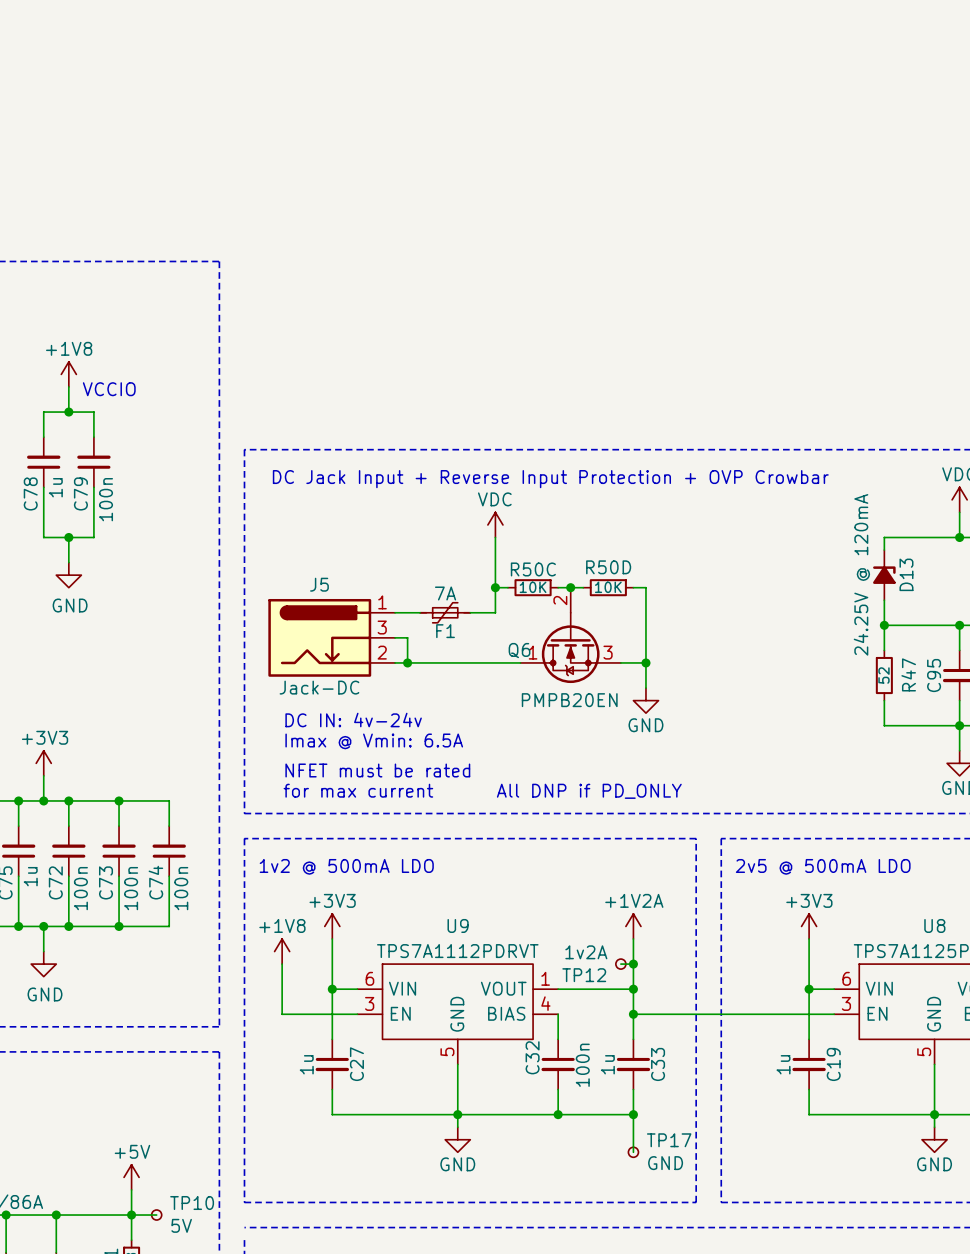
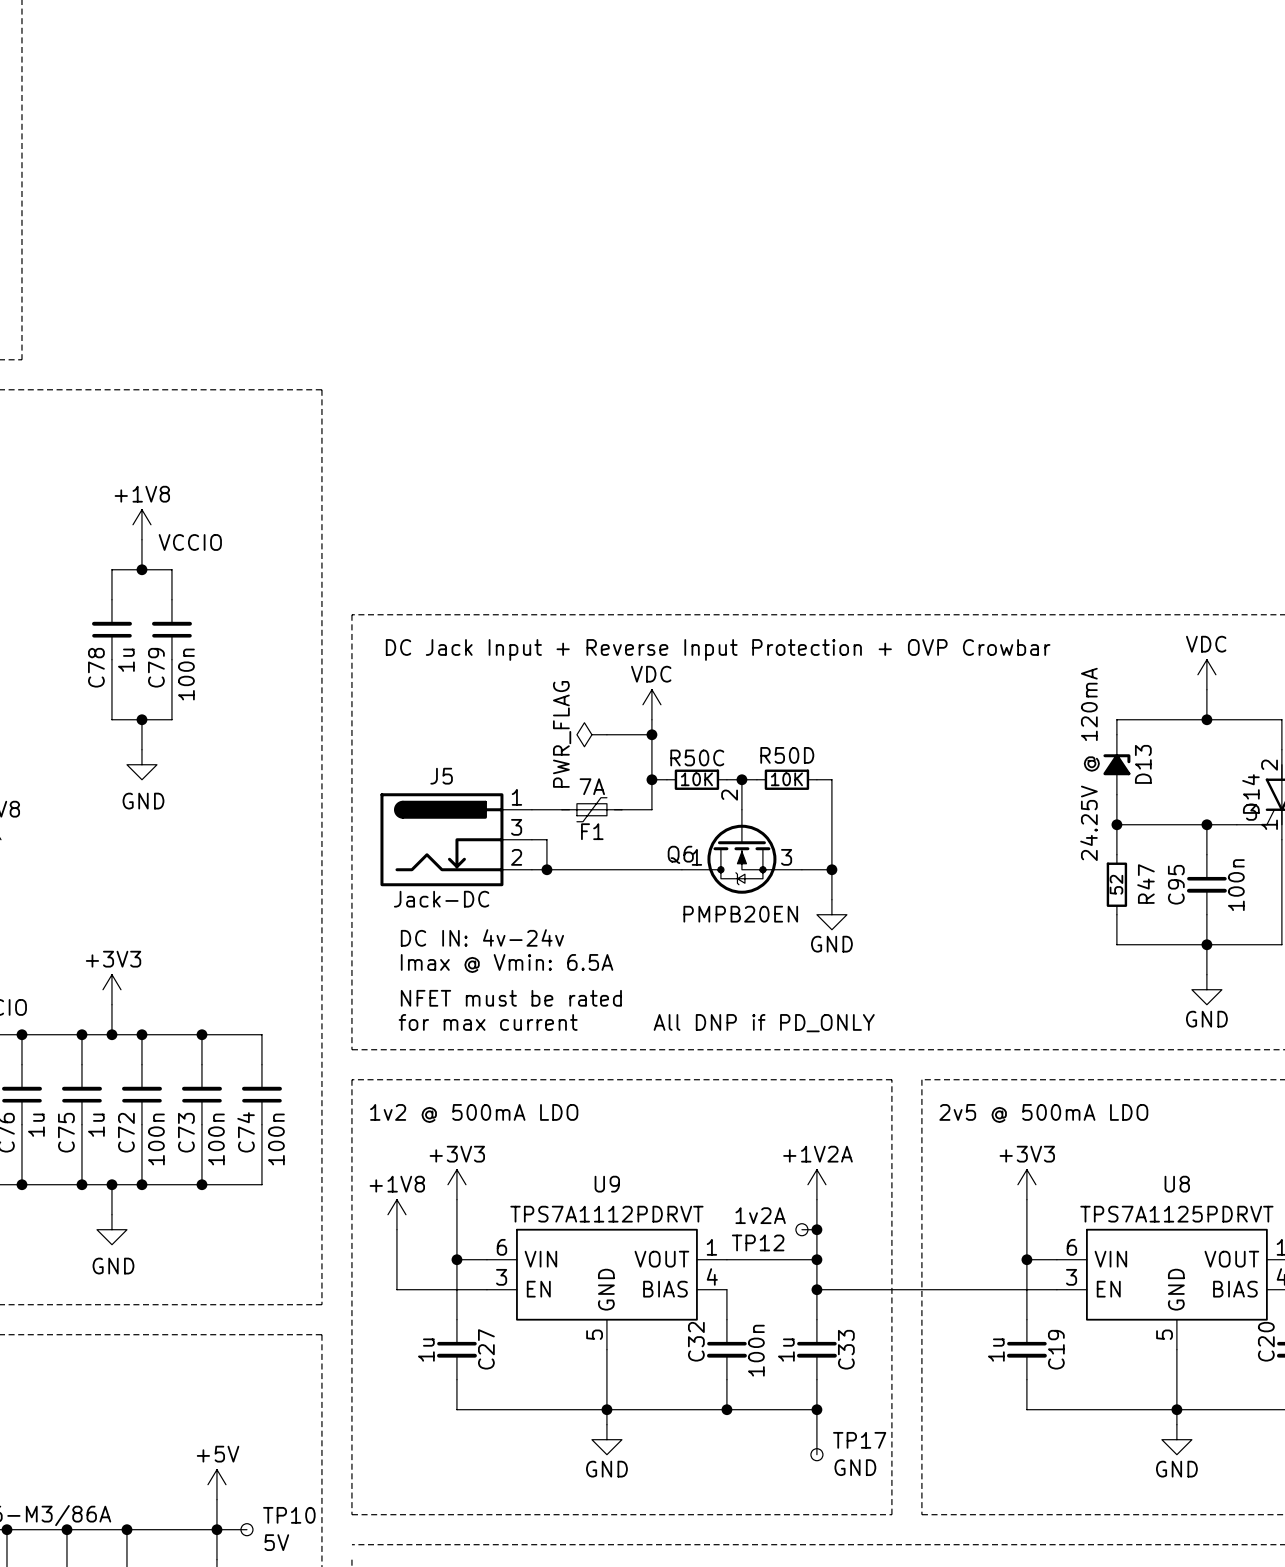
power symbol: none -> PWR_FLAG (591, 734)
wire: none -> (606, 734) (651, 734)
junction: none -> (651, 734)

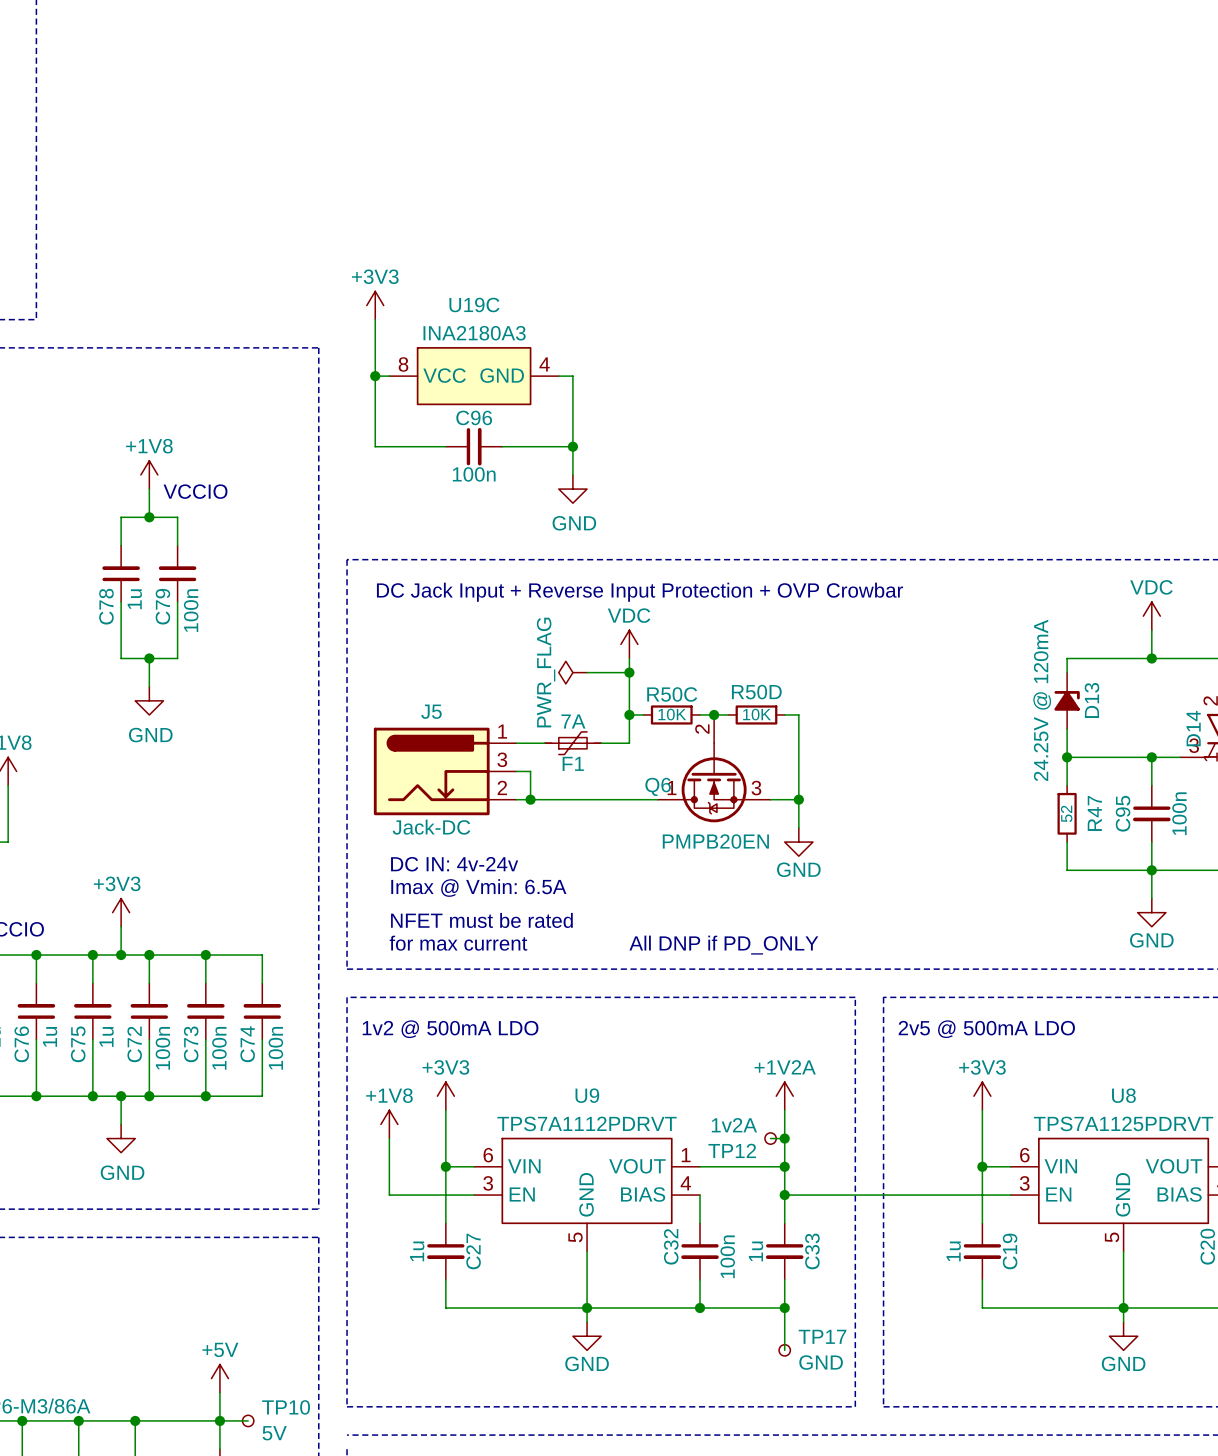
power symbol: none -> +3V3 (375, 305)
wire: none -> (375, 319) (375, 446) (445, 446)
wire: none -> (375, 376) (389, 376)
junction: none -> (375, 376)
U19C: none -> INA2180A3 (474, 376)
wire: none -> (558, 376) (572, 376) (572, 474)
C96: none -> 100n (474, 446)
wire: none -> (502, 446) (572, 446)
junction: none -> (572, 446)
power symbol: none -> GND (572, 489)

